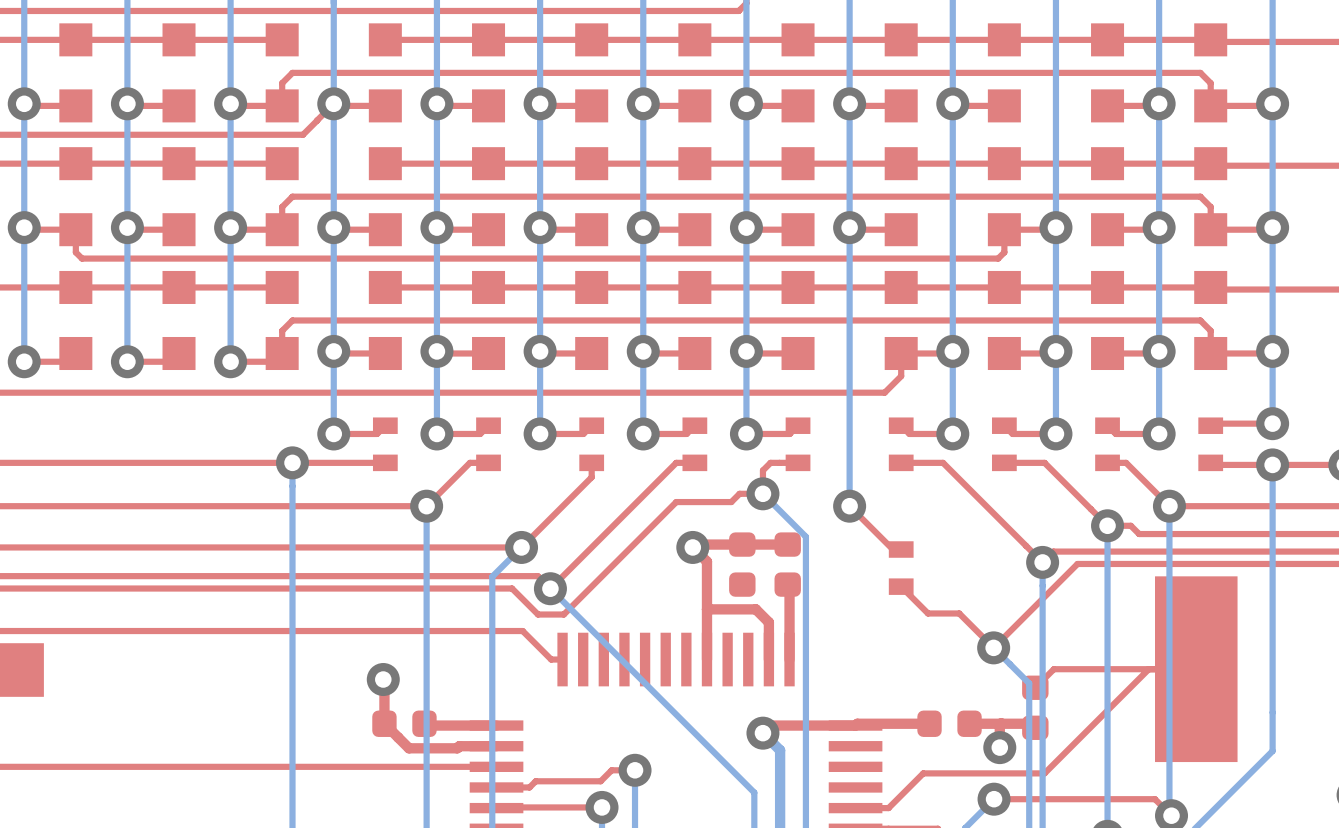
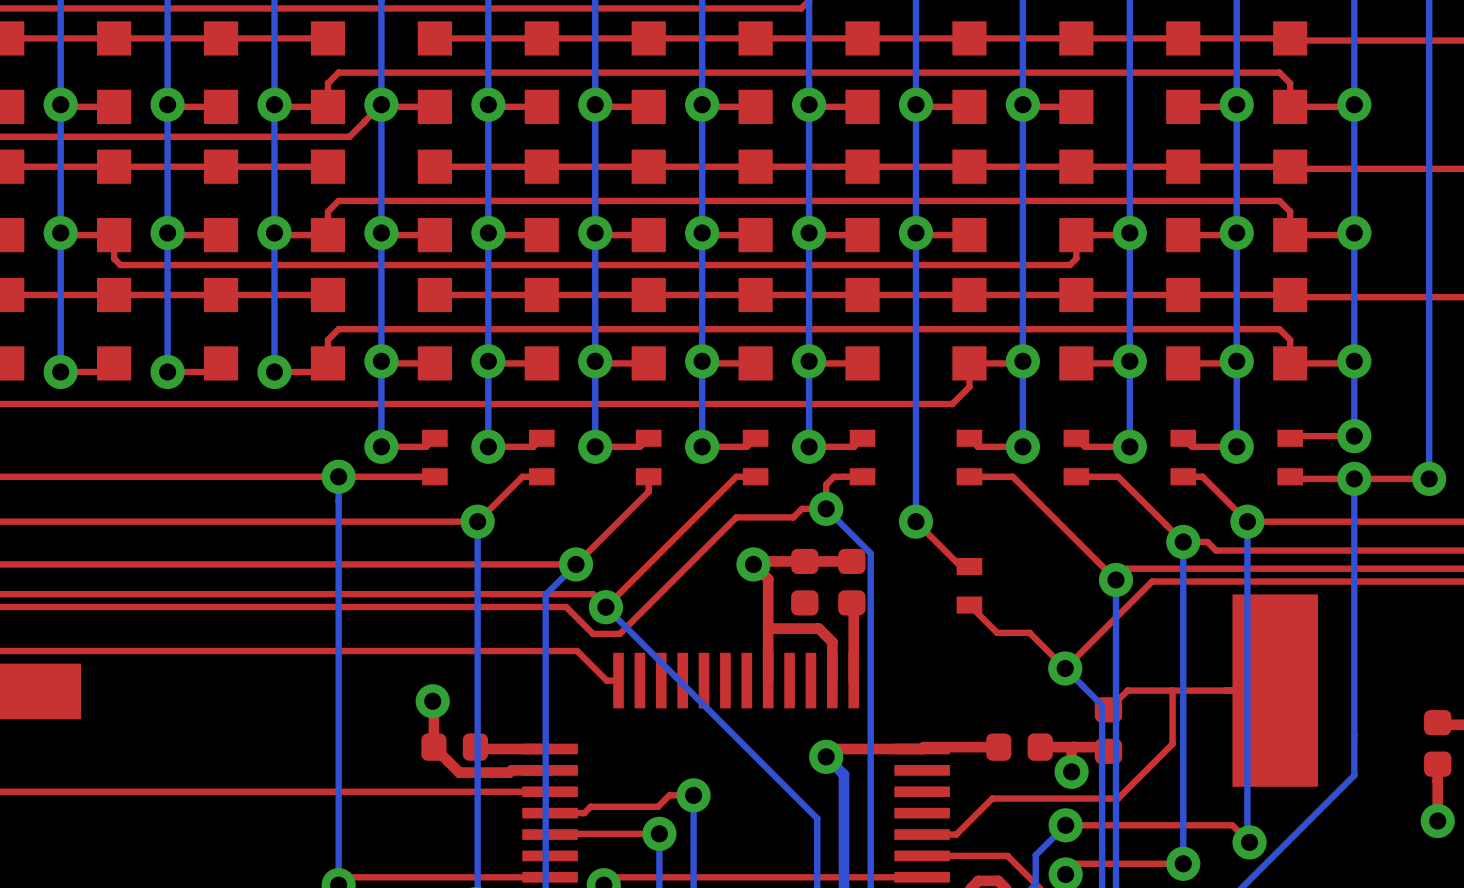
top track: (1148, 669) (1097, 720) -> (1172, 690) (1172, 744)

